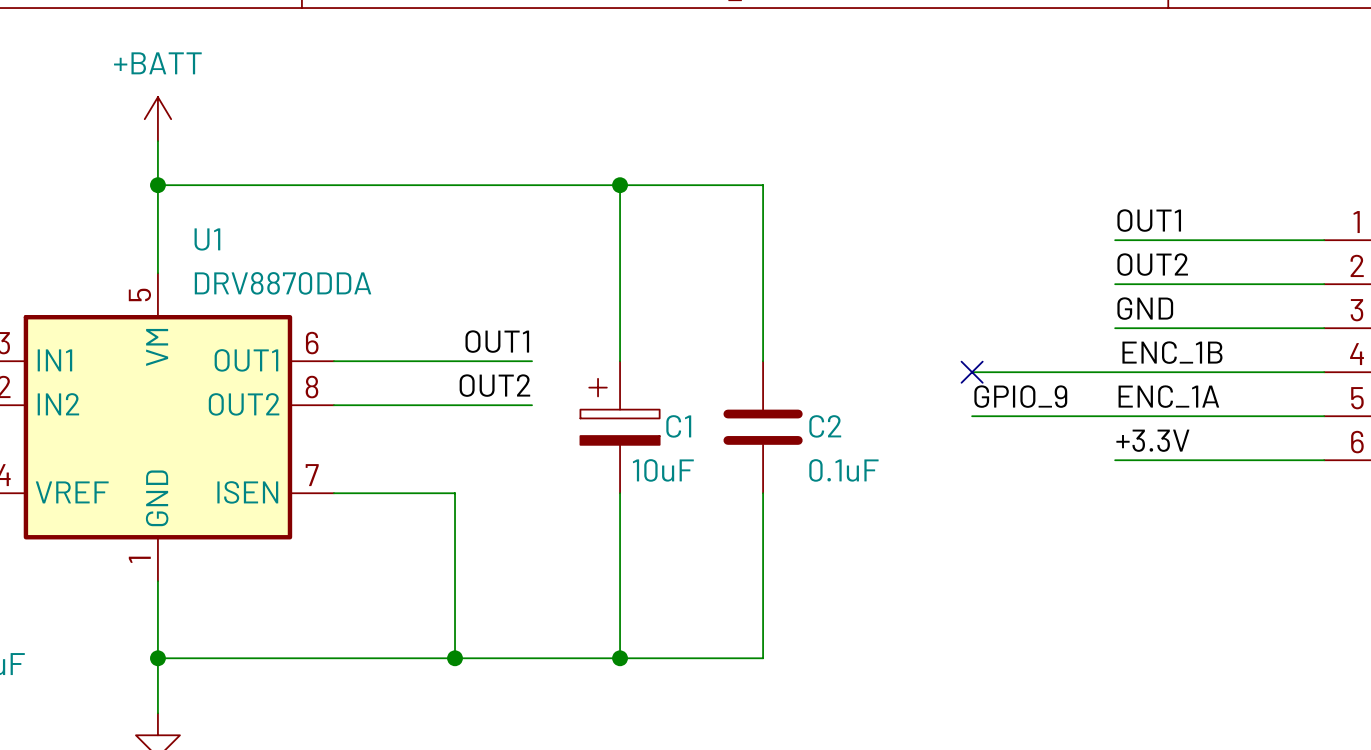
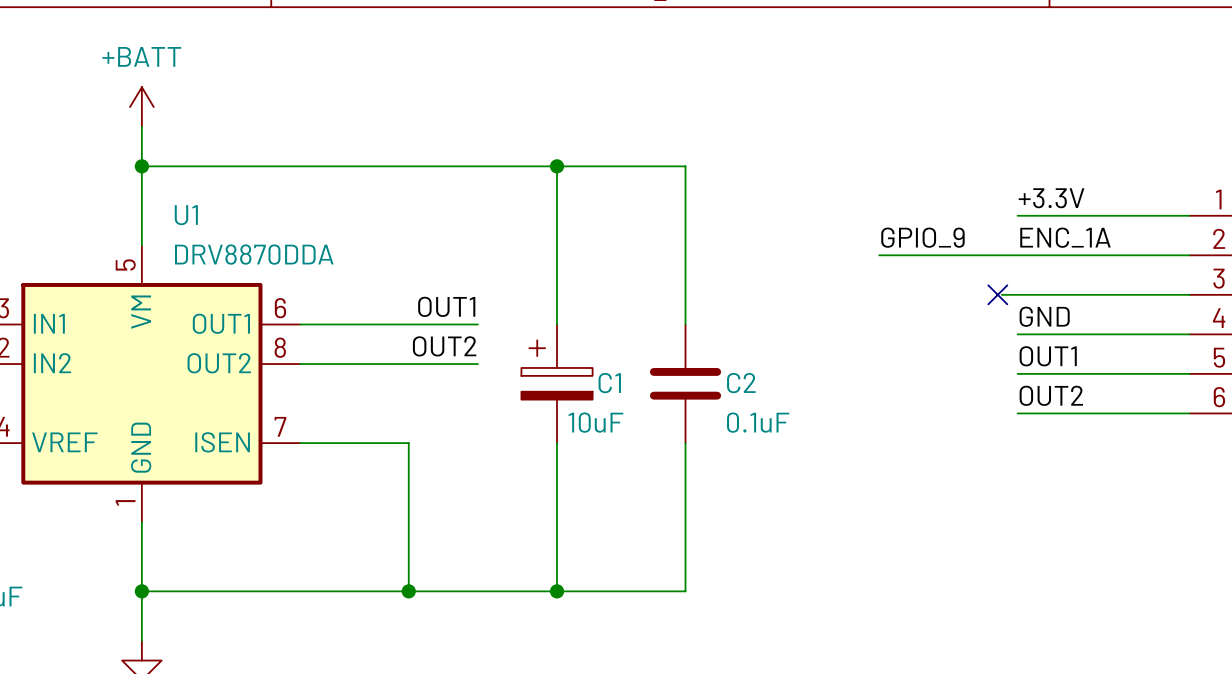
label position: OUT1 (1149, 220) -> OUT1 (1048, 356)
wire: (1115, 240) (1132, 240) -> none
label position: OUT2 (1152, 264) -> OUT2 (1051, 395)
wire: none -> (879, 255) (1001, 255)
label position: GND (1145, 308) -> GND (1044, 316)
no-connect mark: none -> (997, 294)
label: ENC_1B (1172, 352) -> none
wire: (972, 372) (1132, 372) -> none
no-connect mark: (972, 372) -> none
label position: GPIO_9 (1020, 396) -> GPIO_9 (922, 237)
label position: ENC_1A (1168, 396) -> ENC_1A (1065, 237)
wire: (972, 416) (1132, 416) -> none
label position: +3.3V (1152, 440) -> +3.3V (1051, 198)
wire: (1115, 460) (1132, 460) -> none

